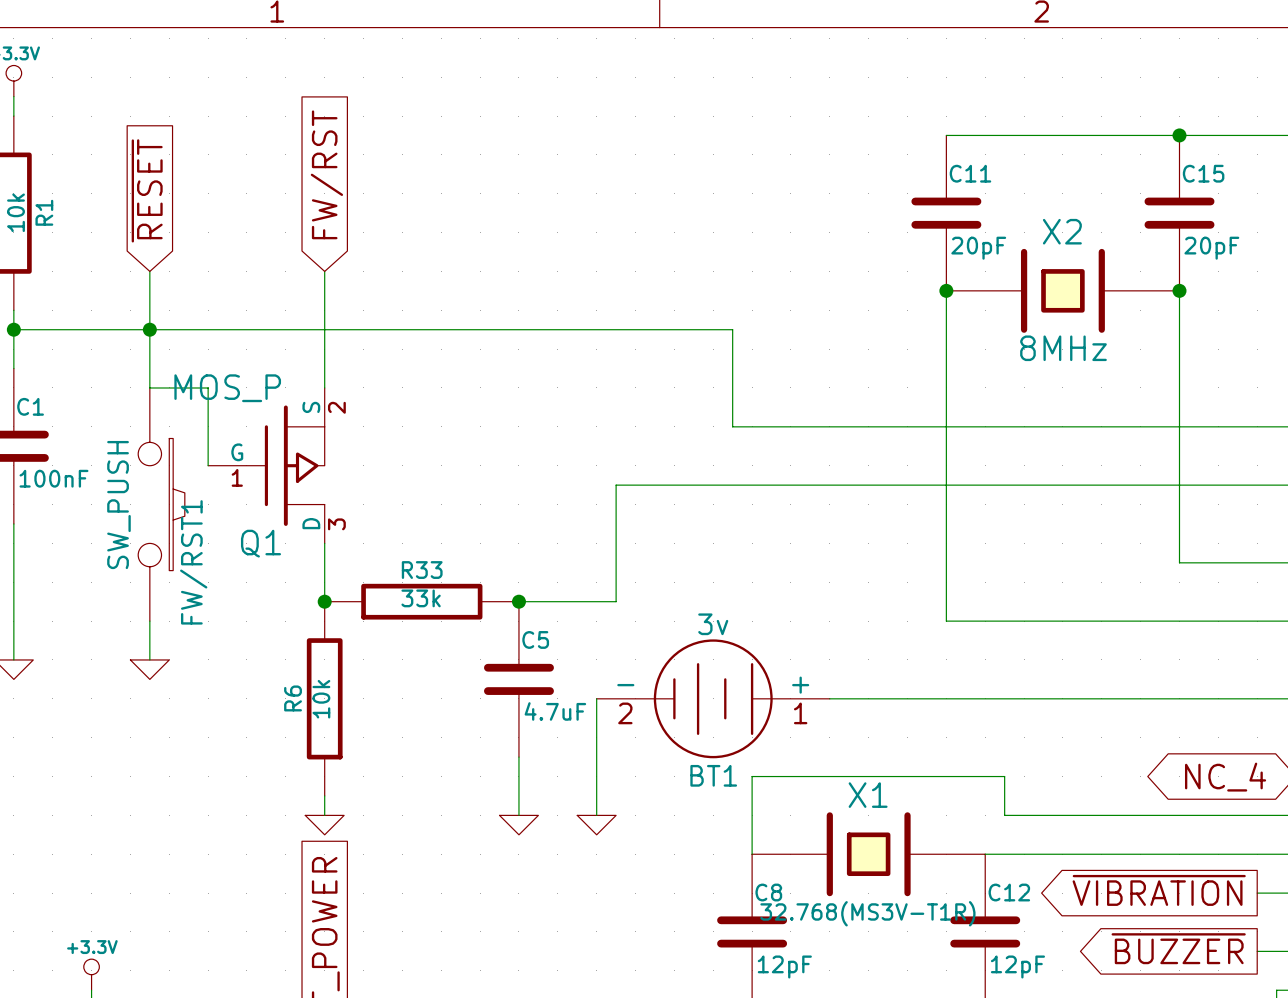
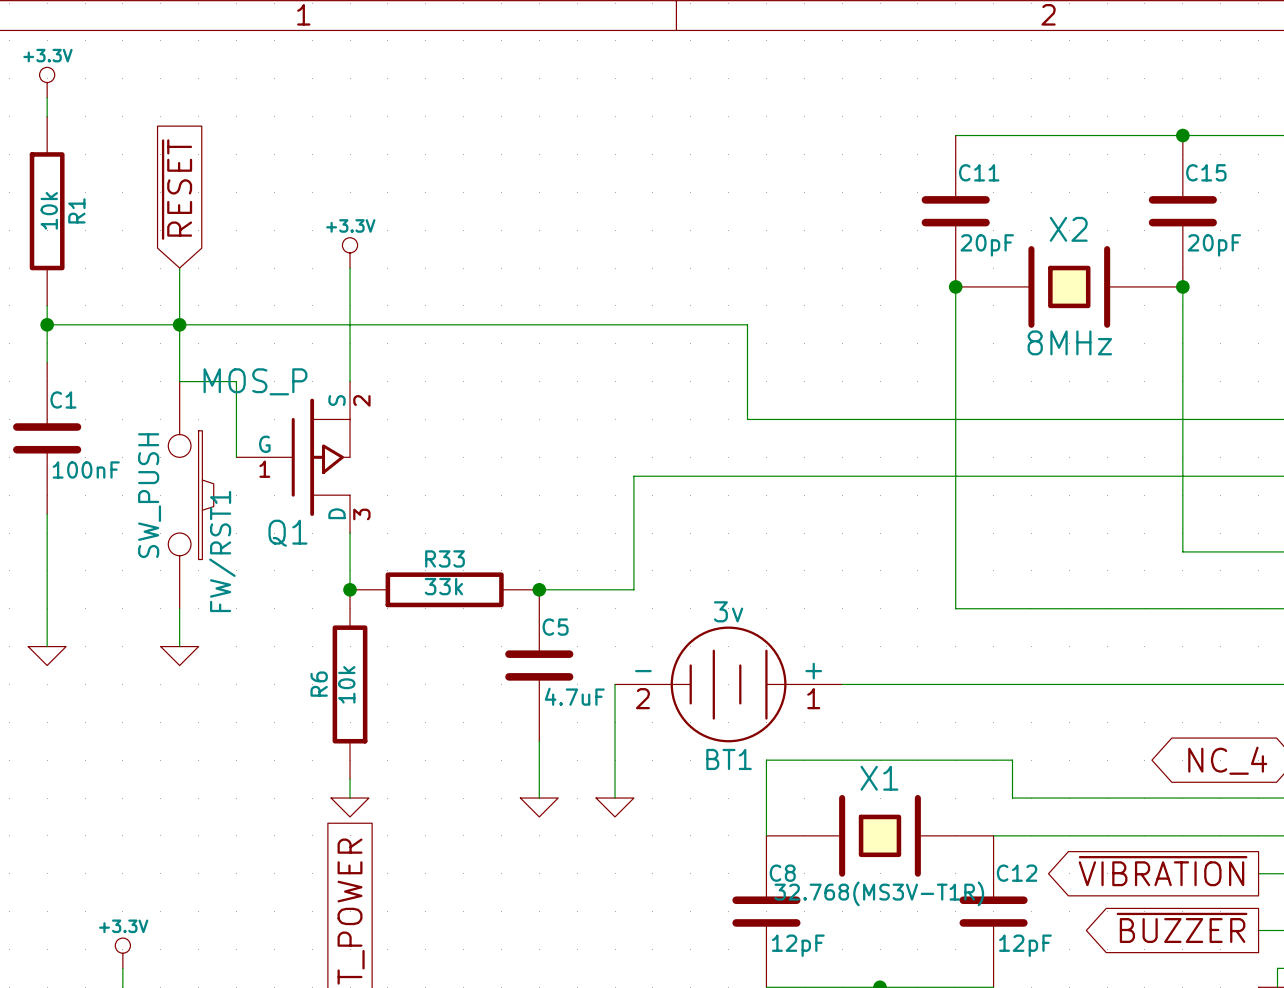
global label: FW/RST (326, 174) -> none
power symbol: none -> +3.3V (350, 252)

